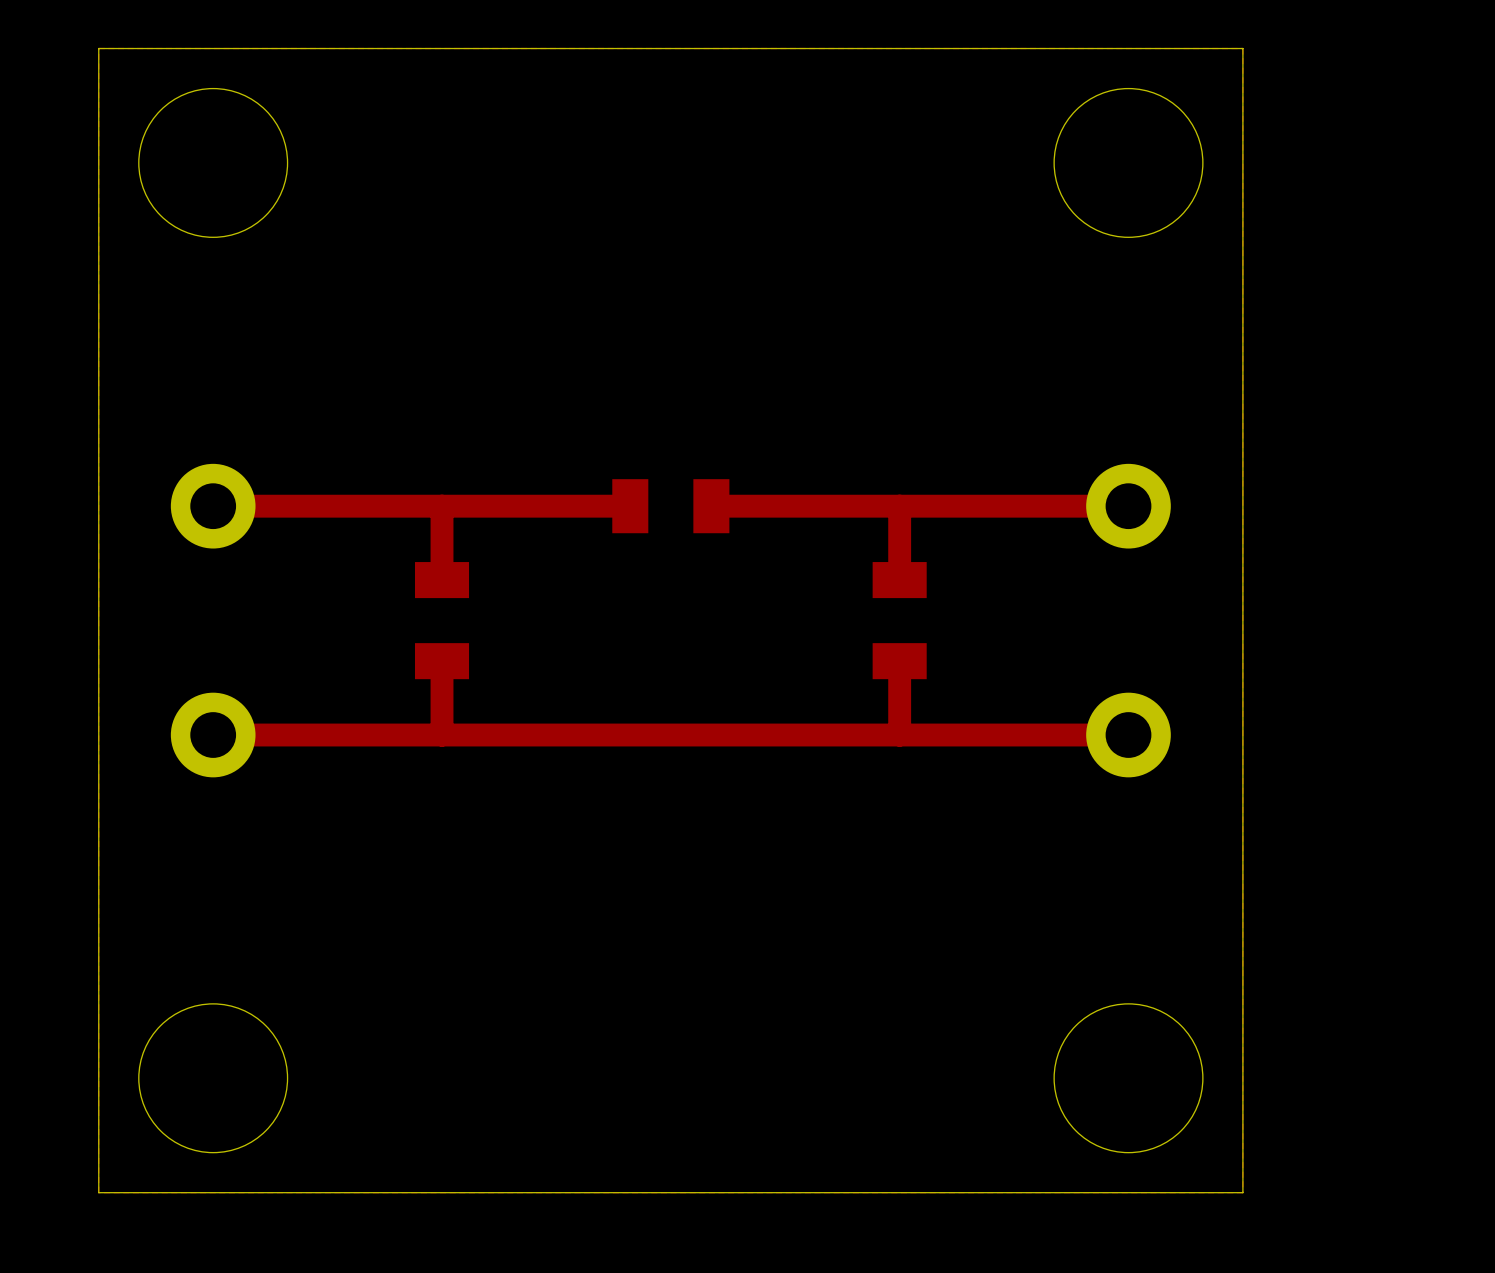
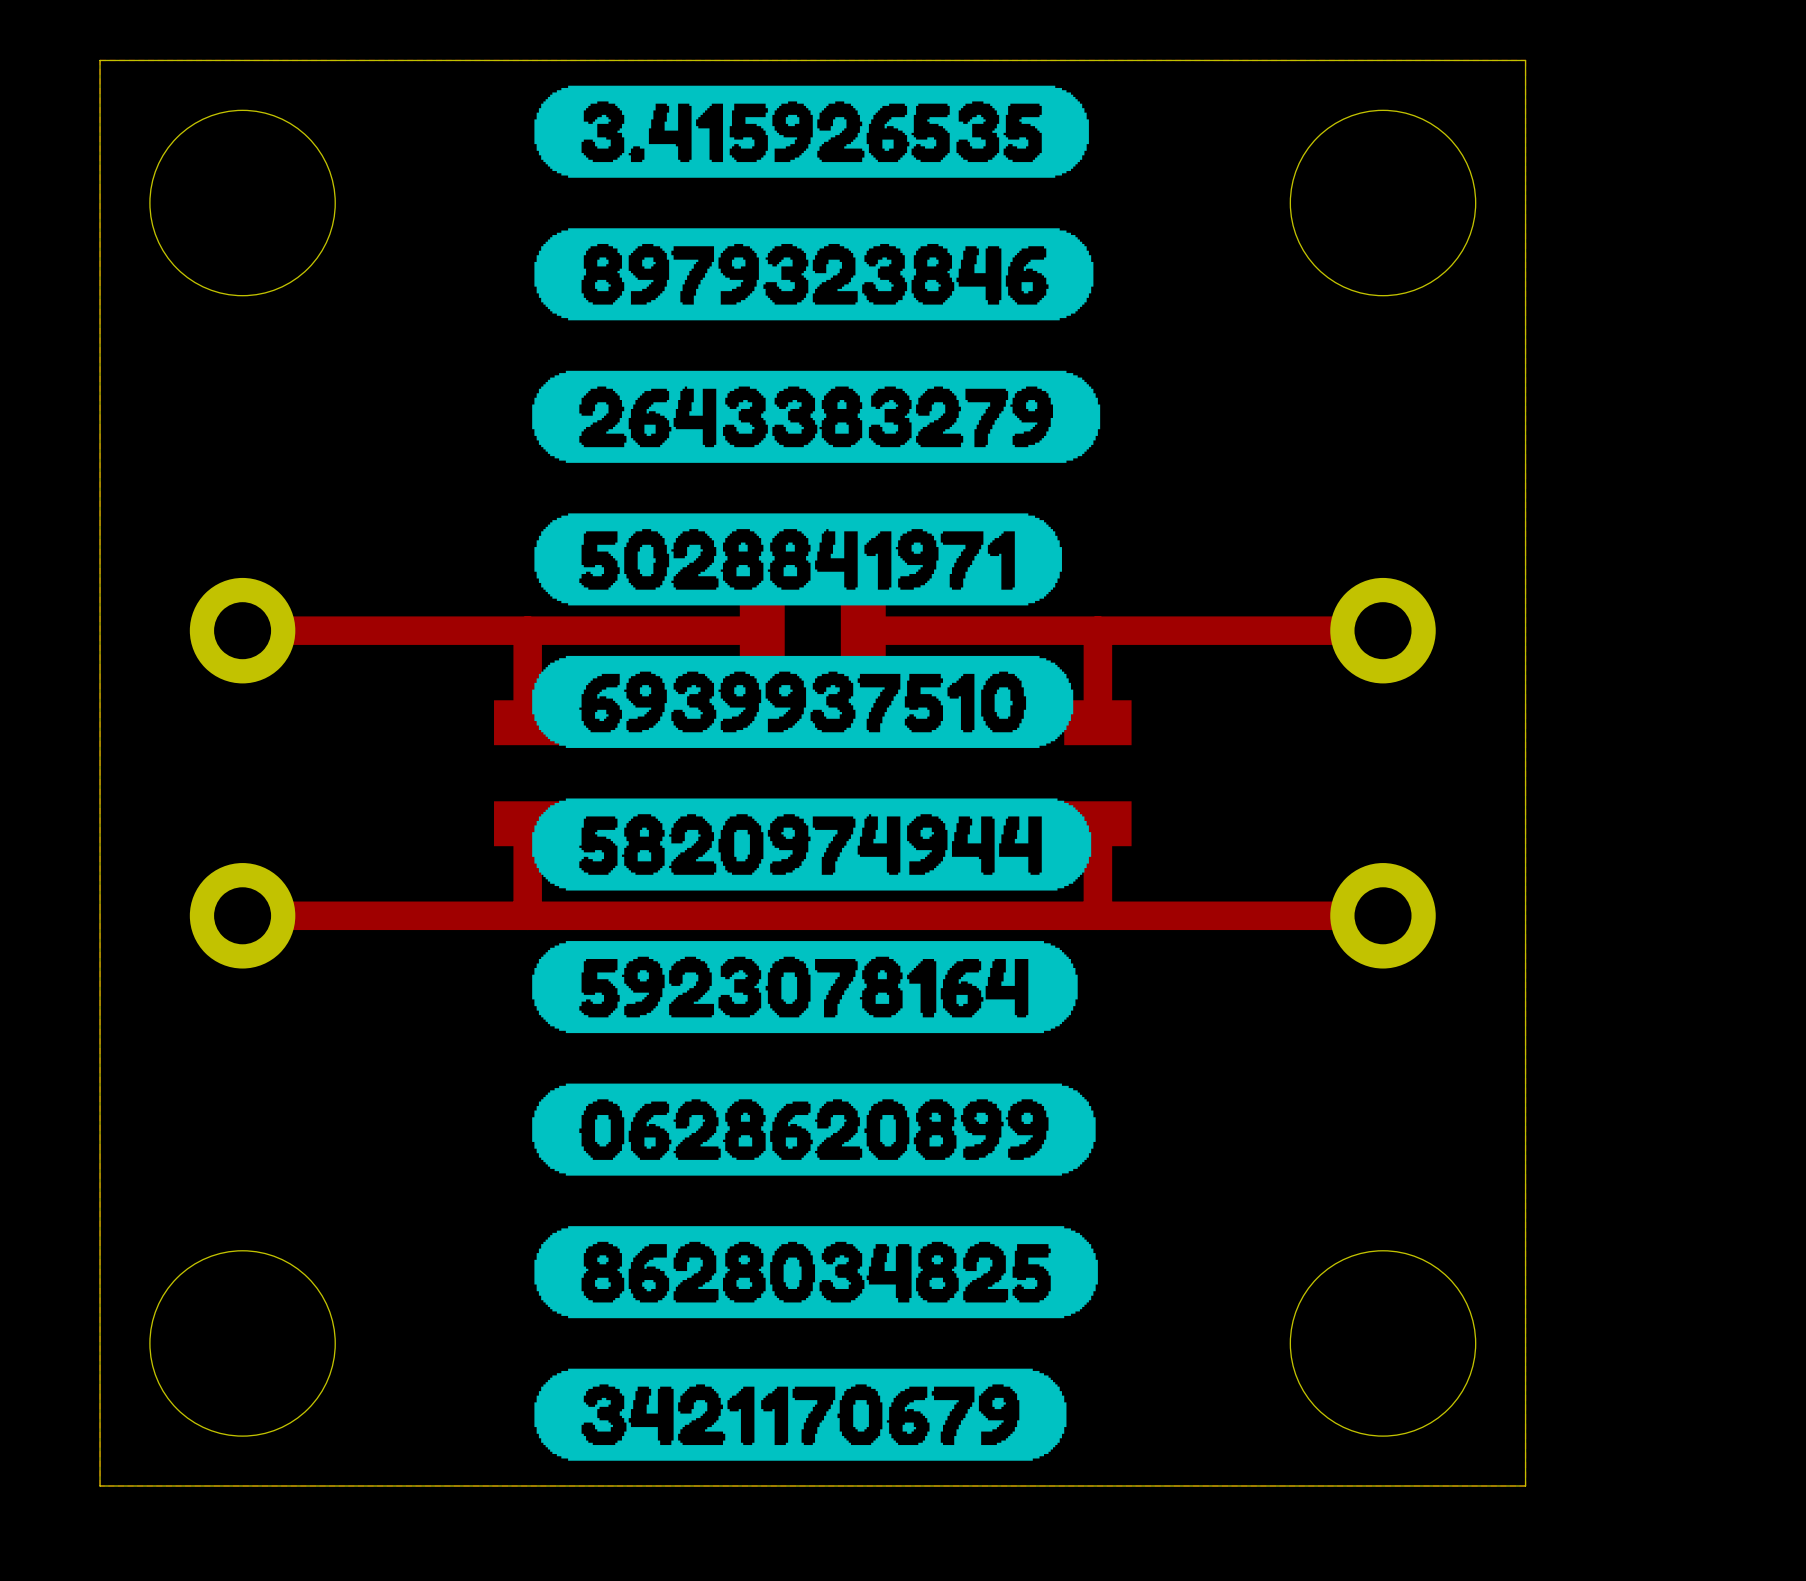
drawing: none -> [532, 85, 1101, 1461]

